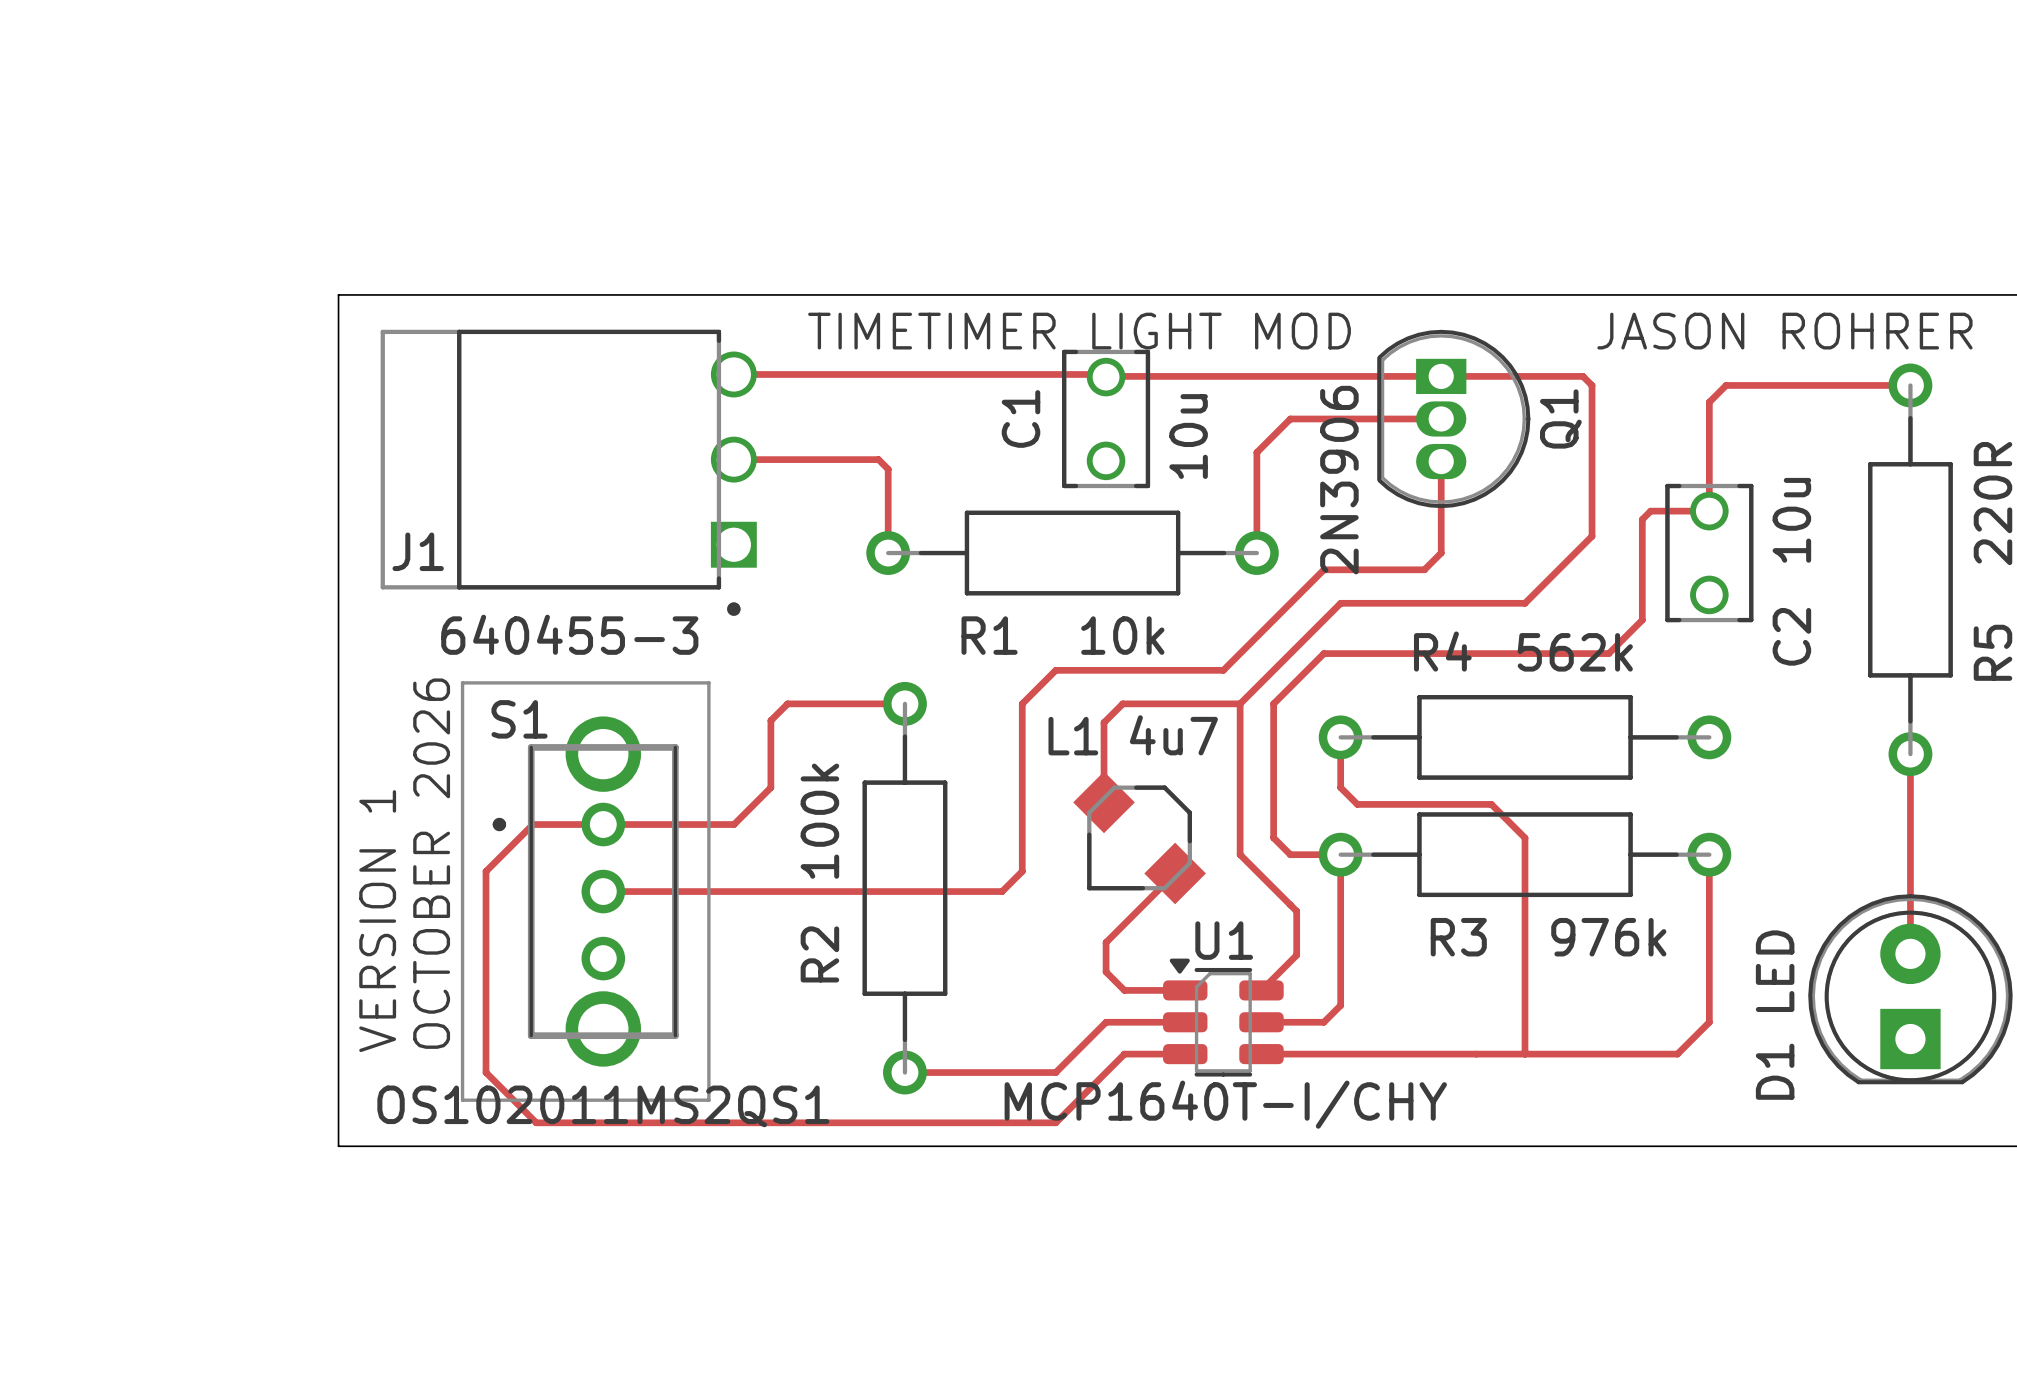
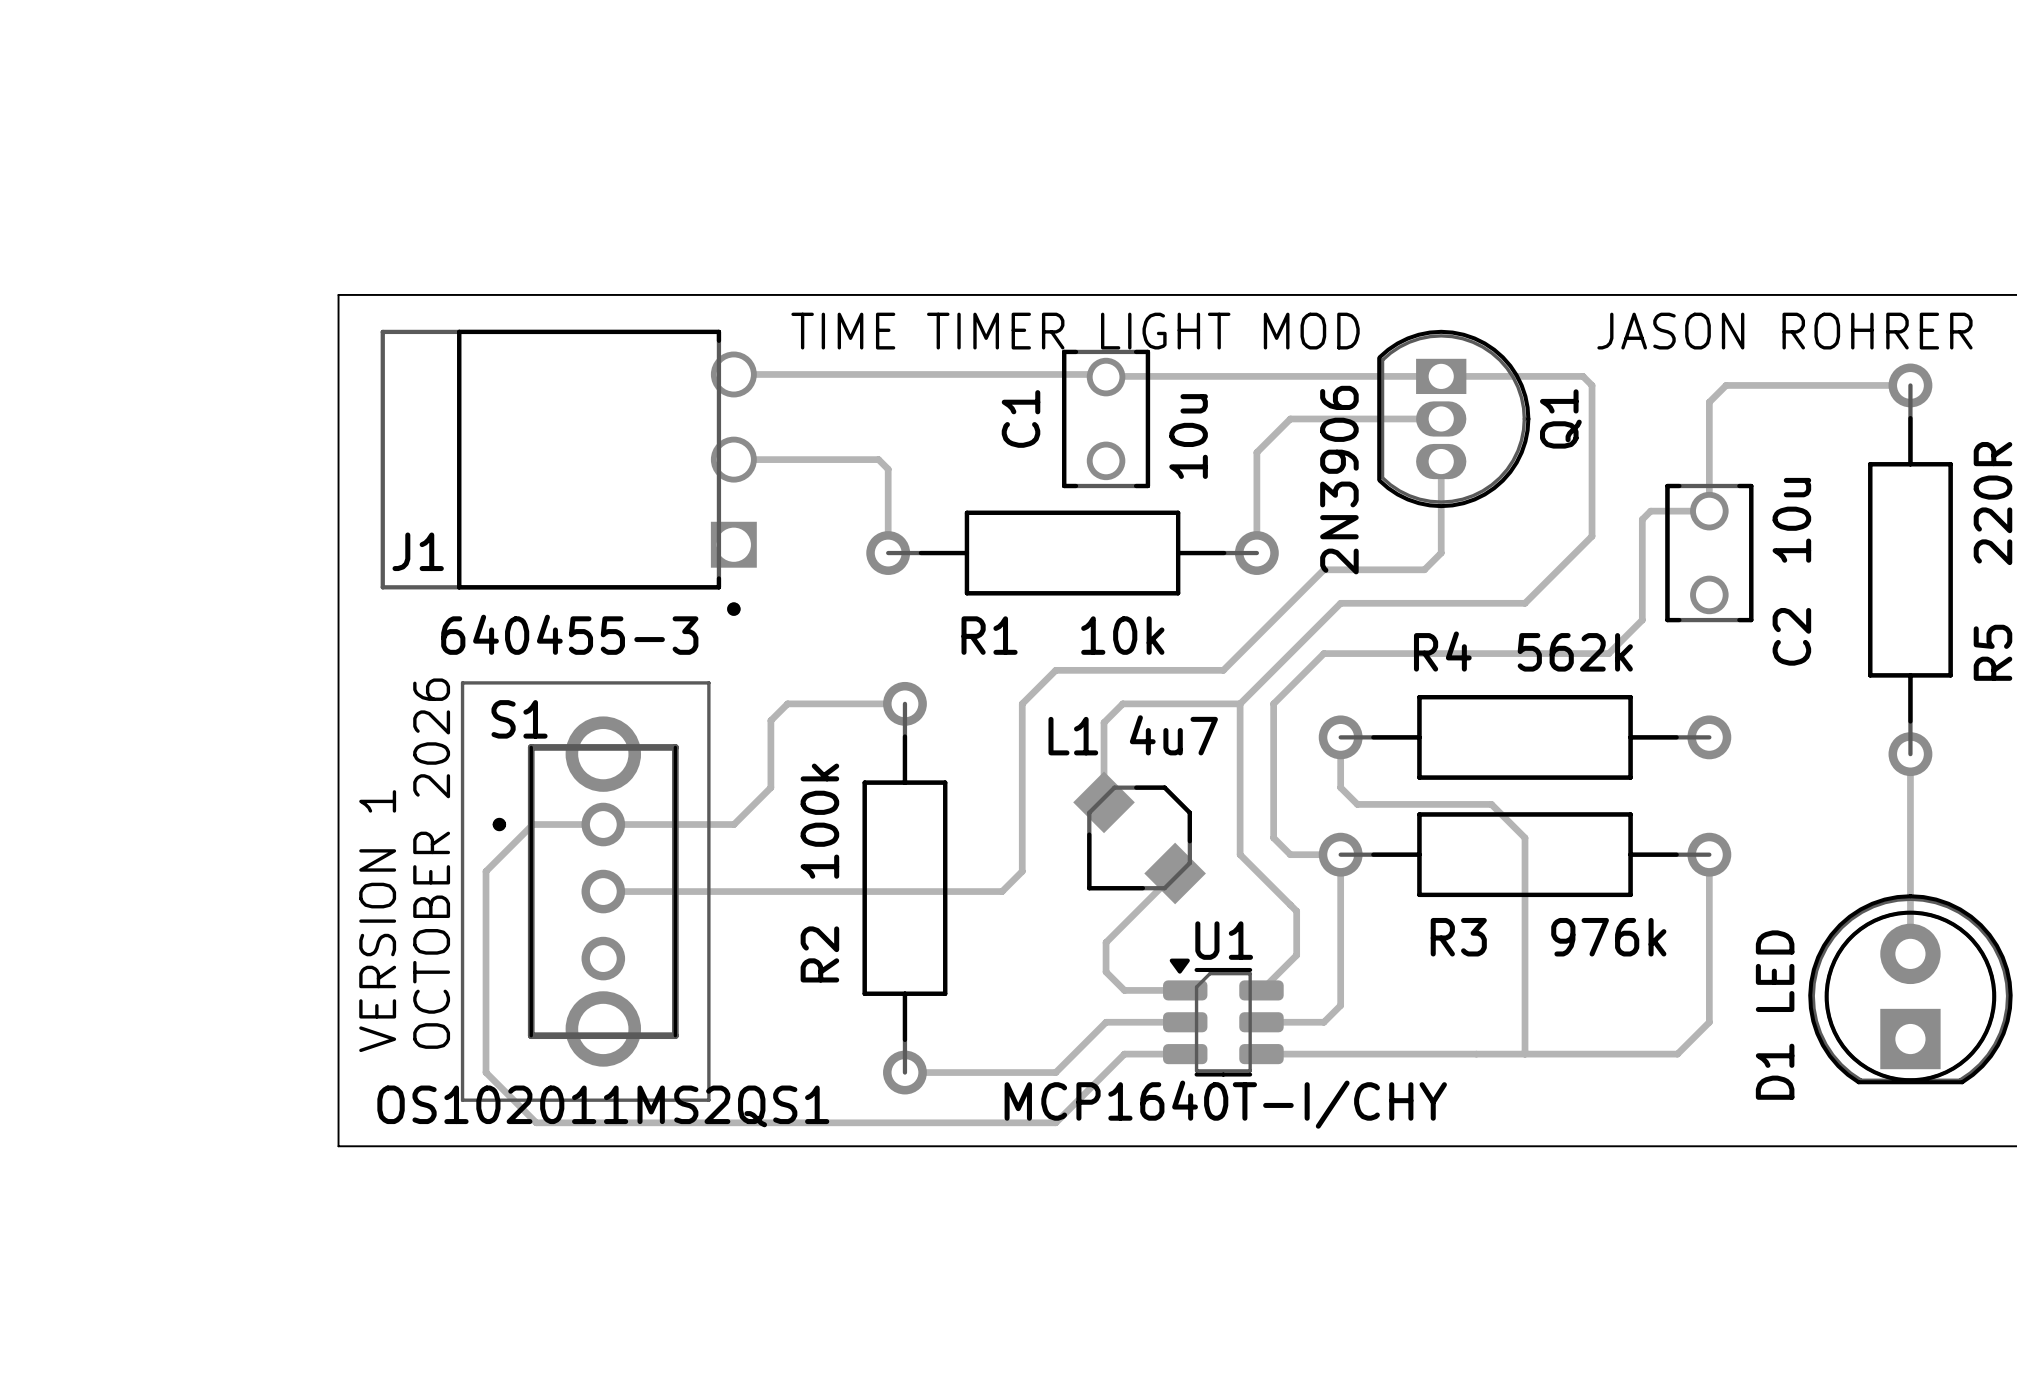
text: TIMETIMER LIGHT MOD (1079, 331) -> TIME TIMER LIGHT MOD (1075, 331)

